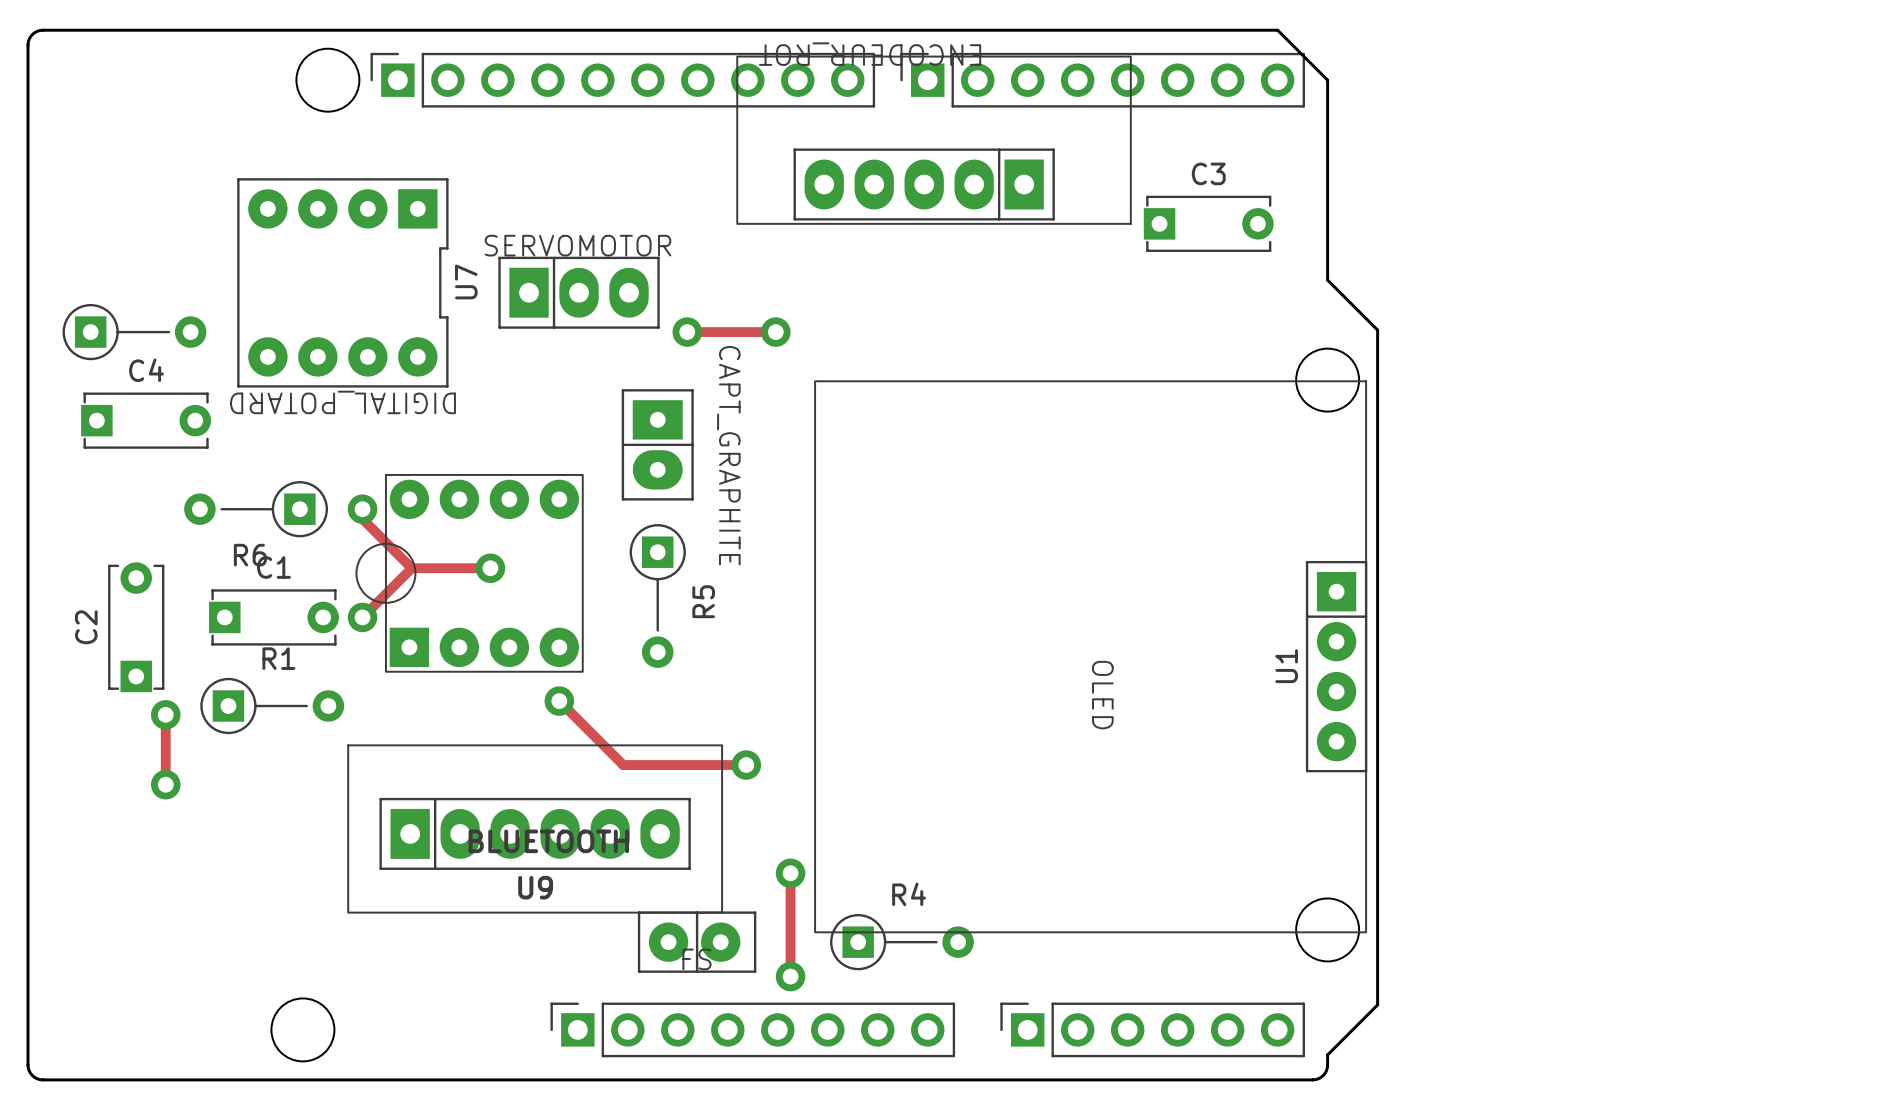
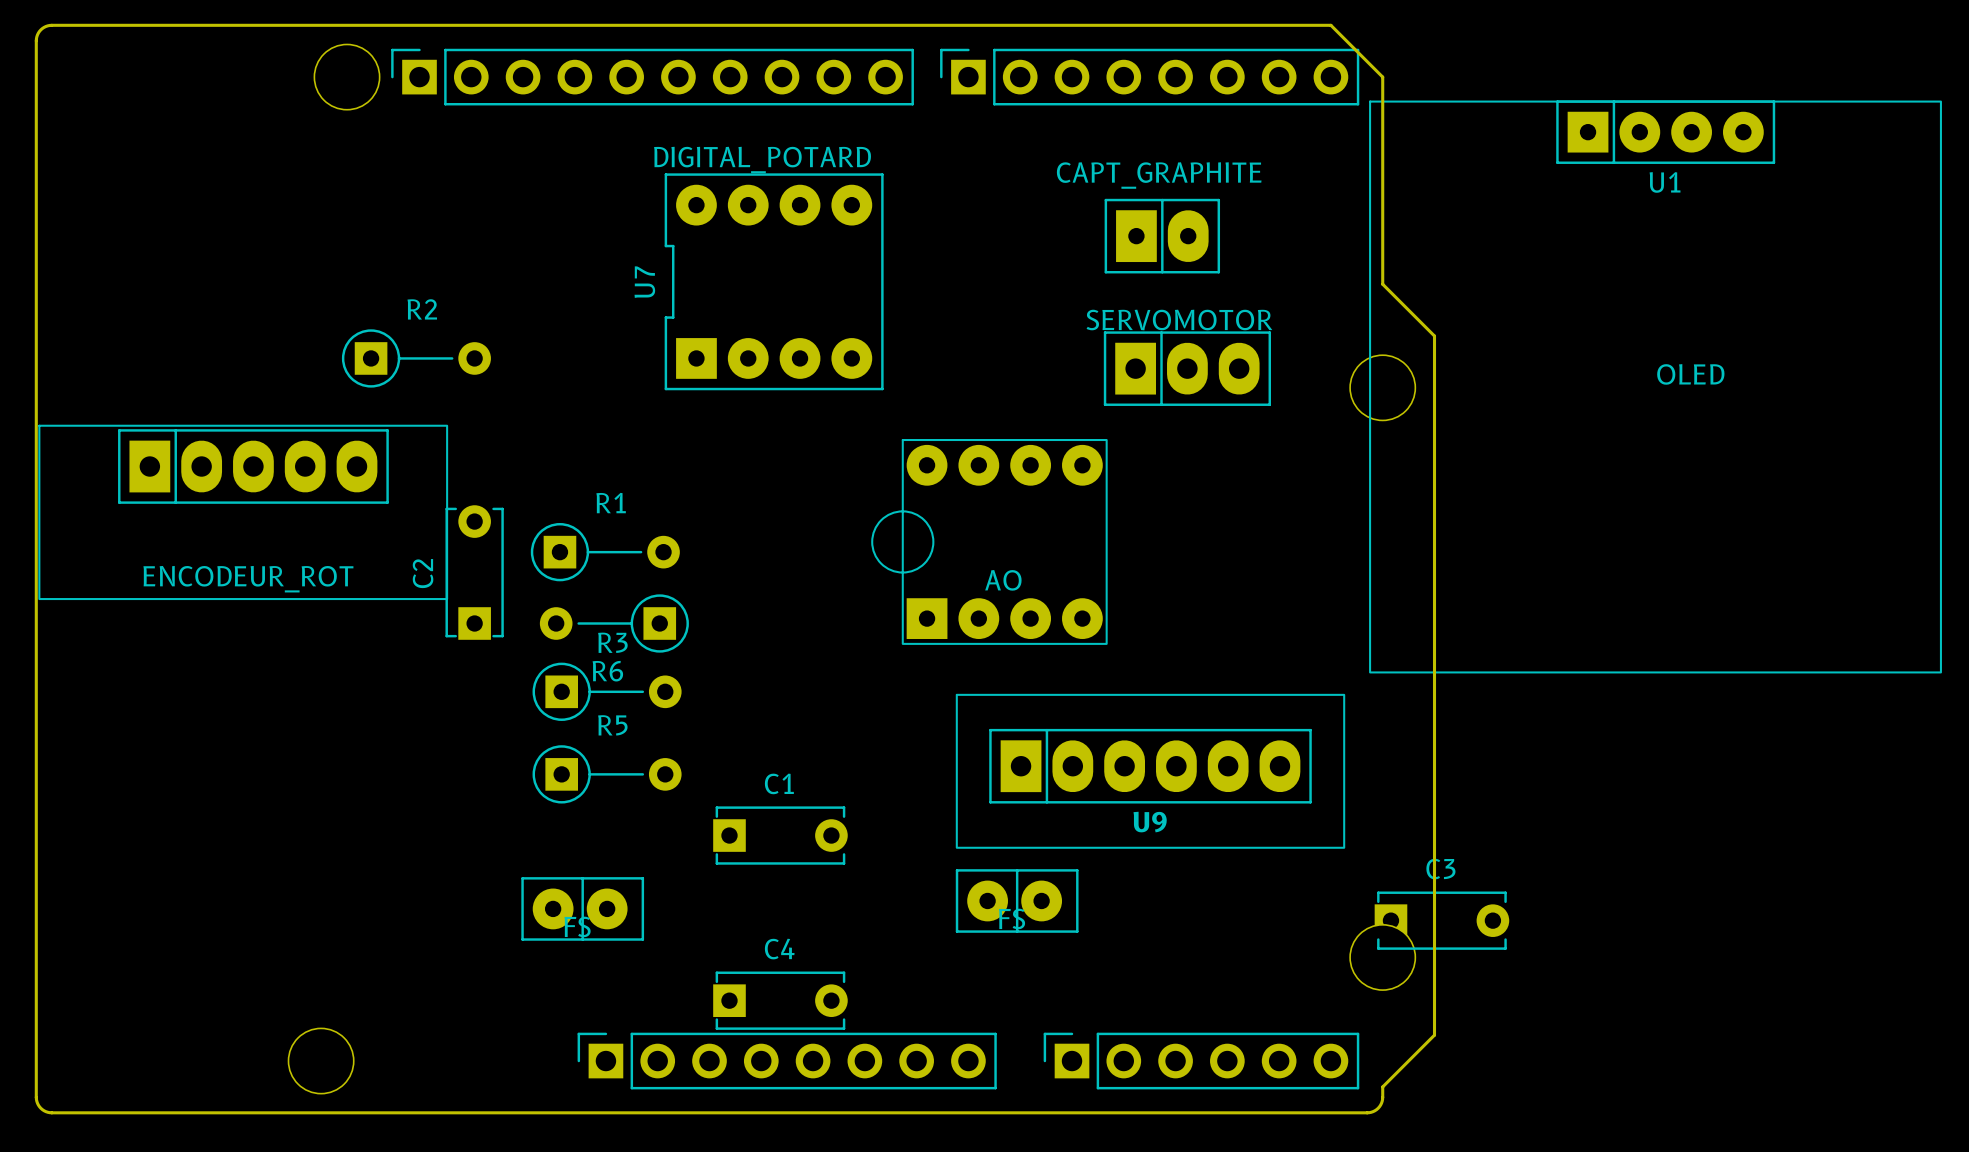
part: (934, 140) -> none
C3 position: (1208, 223) -> (1441, 920)
part: none -> (1162, 236)
U7 rotation: 0° (342, 282) -> 180° (774, 281)
U7 position: (342, 282) -> (774, 281)
part: (579, 292) -> none
part: (134, 332) -> none
track: (687, 332) (775, 332) -> none
via: (687, 332) -> none
via: (775, 332) -> none
R2: none -> (416, 358)
part: none -> (1187, 368)
C4 position: (146, 420) -> (780, 1000)
part: (657, 444) -> none
part: none -> (243, 512)
R6 position: (256, 509) -> (614, 623)
track: (362, 509) (362, 519) (411, 568) -> none
via: (362, 509) -> none
part: none -> (989, 541)
track: (411, 568) (490, 568) -> none
track: (411, 568) (362, 617) -> none
via: (490, 568) -> none
part: (469, 573) -> none
R5 rotation: 0° (657, 595) -> 90° counterclockwise (607, 774)
R5 position: (657, 595) -> (607, 774)
C1 position: (273, 617) -> (780, 835)
via: (362, 617) -> none
C2 position: (136, 627) -> (474, 572)
U1 rotation: 0° (1090, 656) -> 90° counterclockwise (1655, 386)
U1 position: (1090, 656) -> (1655, 386)
R3: none -> (607, 691)
track: (559, 701) (623, 765) (746, 765) -> none
via: (559, 701) -> none
R1 position: (272, 705) -> (605, 552)
track: (165, 714) (165, 784) -> none
via: (165, 714) -> none
U9 footprint: [347, 744, 724, 914] -> [955, 693, 1346, 849]
via: (746, 765) -> none
via: (165, 784) -> none
track: (790, 873) (790, 976) -> none
via: (790, 873) -> none
part: none -> (1017, 900)
part: none -> (582, 908)
part: (697, 942) -> none
R4: (901, 942) -> none
via: (790, 976) -> none

